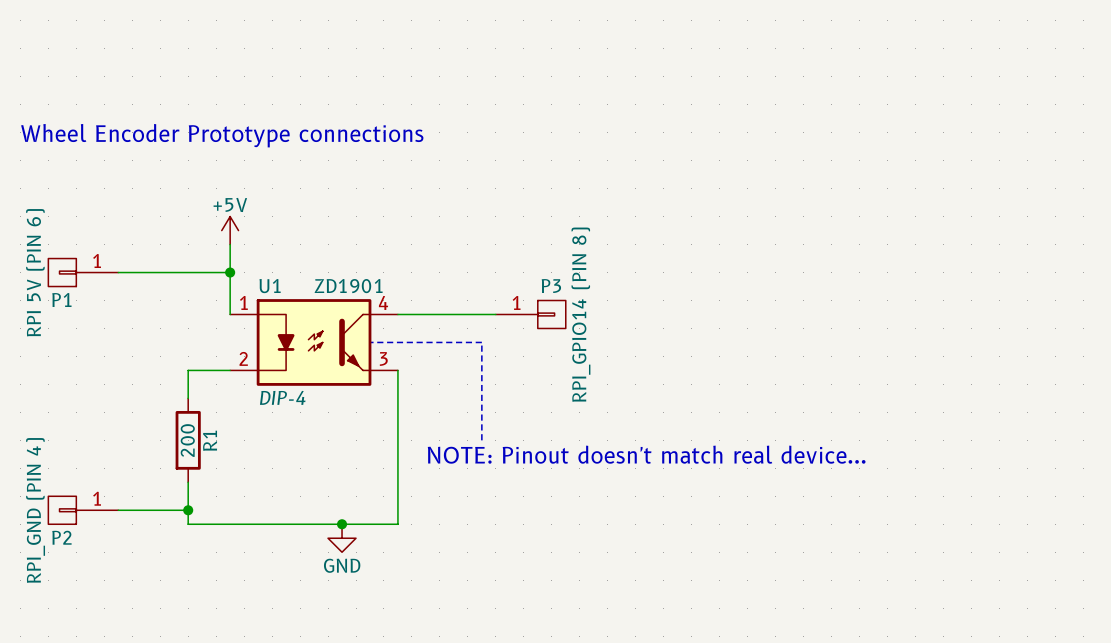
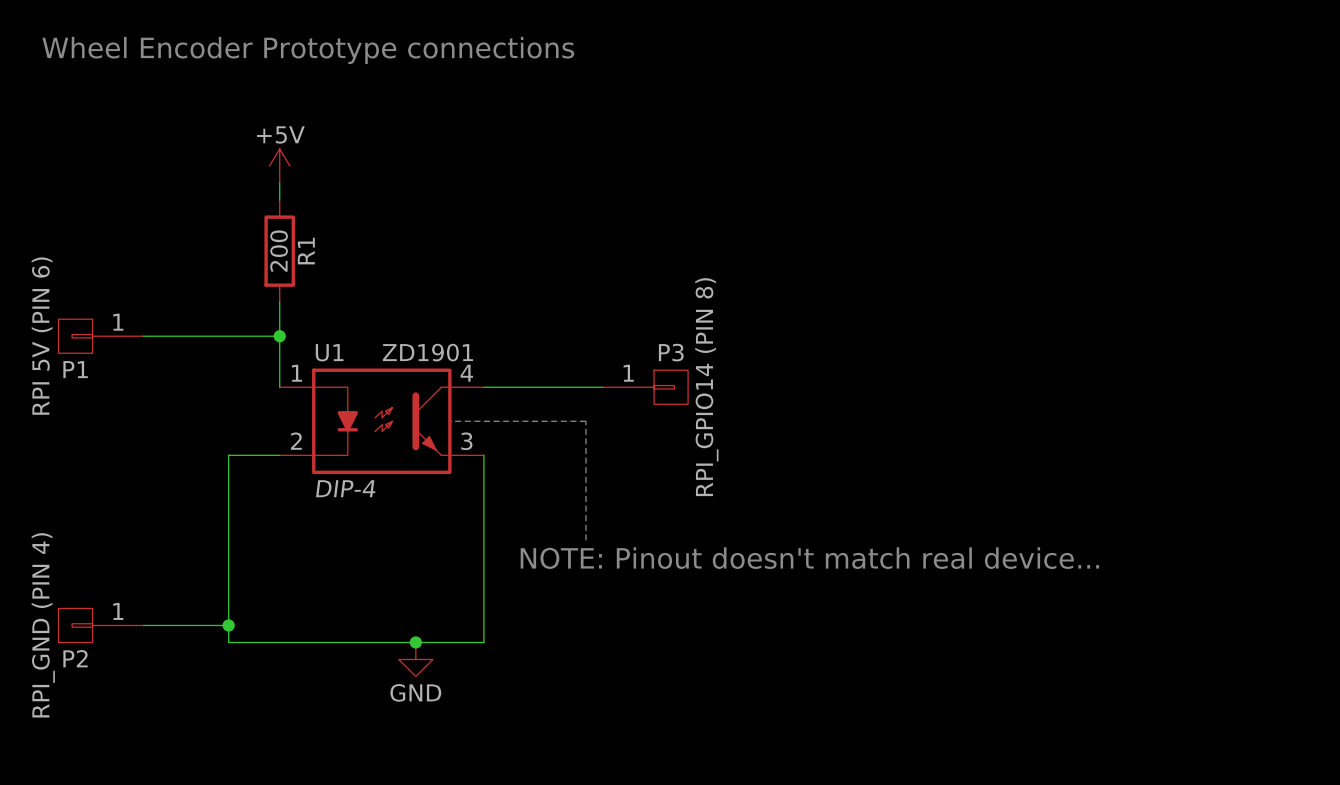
text position: Wheel Encoder Prototype connections (222, 135) -> Wheel Encoder Prototype connections (308, 50)
wire: none -> (279, 183) (279, 200)
power symbol position: +5V (230, 230) -> +5V (279, 166)
wire: none -> (228, 489) (228, 591)
R1 position: (188, 440) -> (279, 251)

